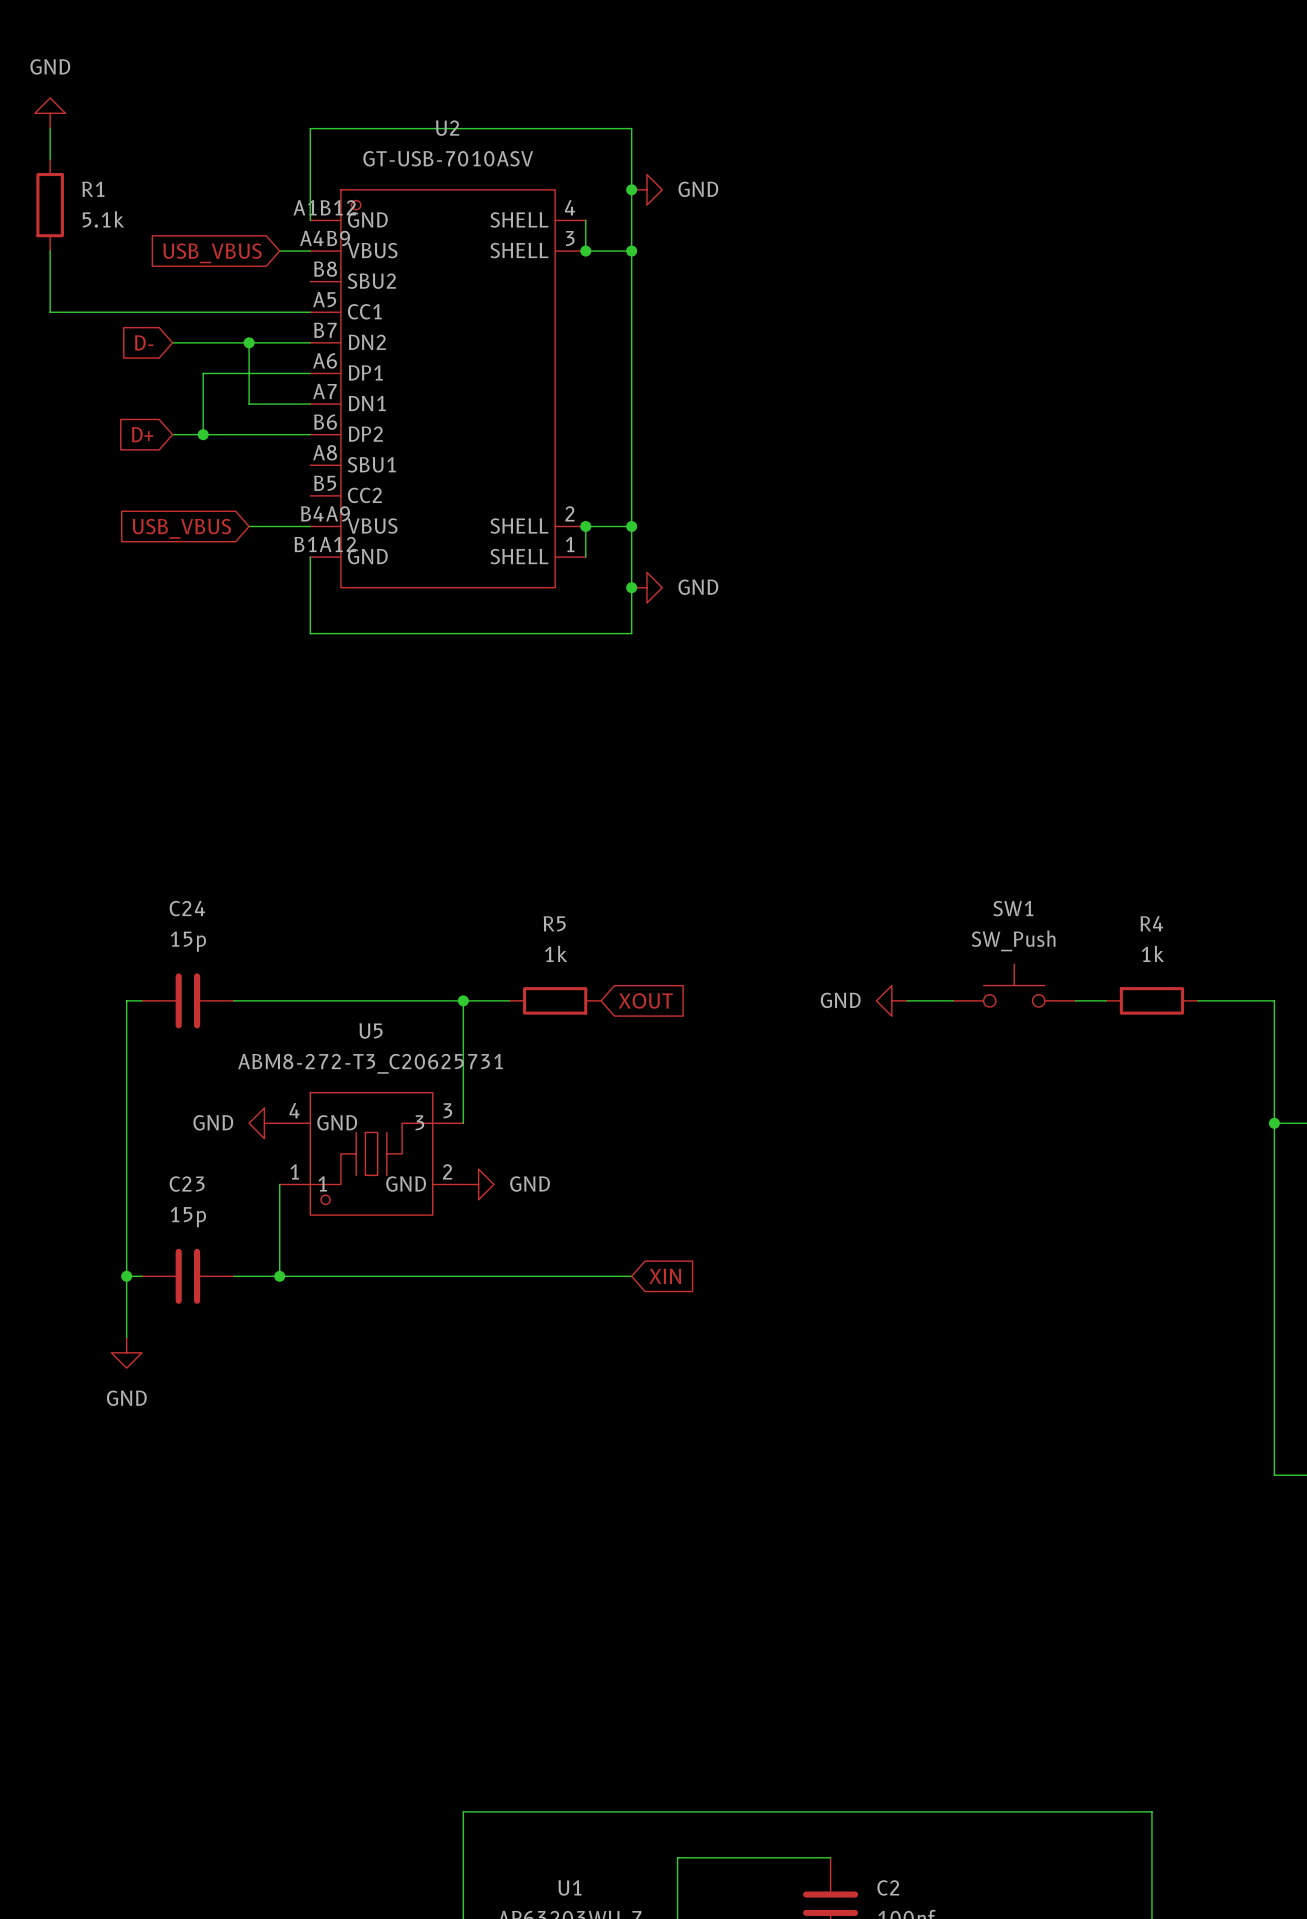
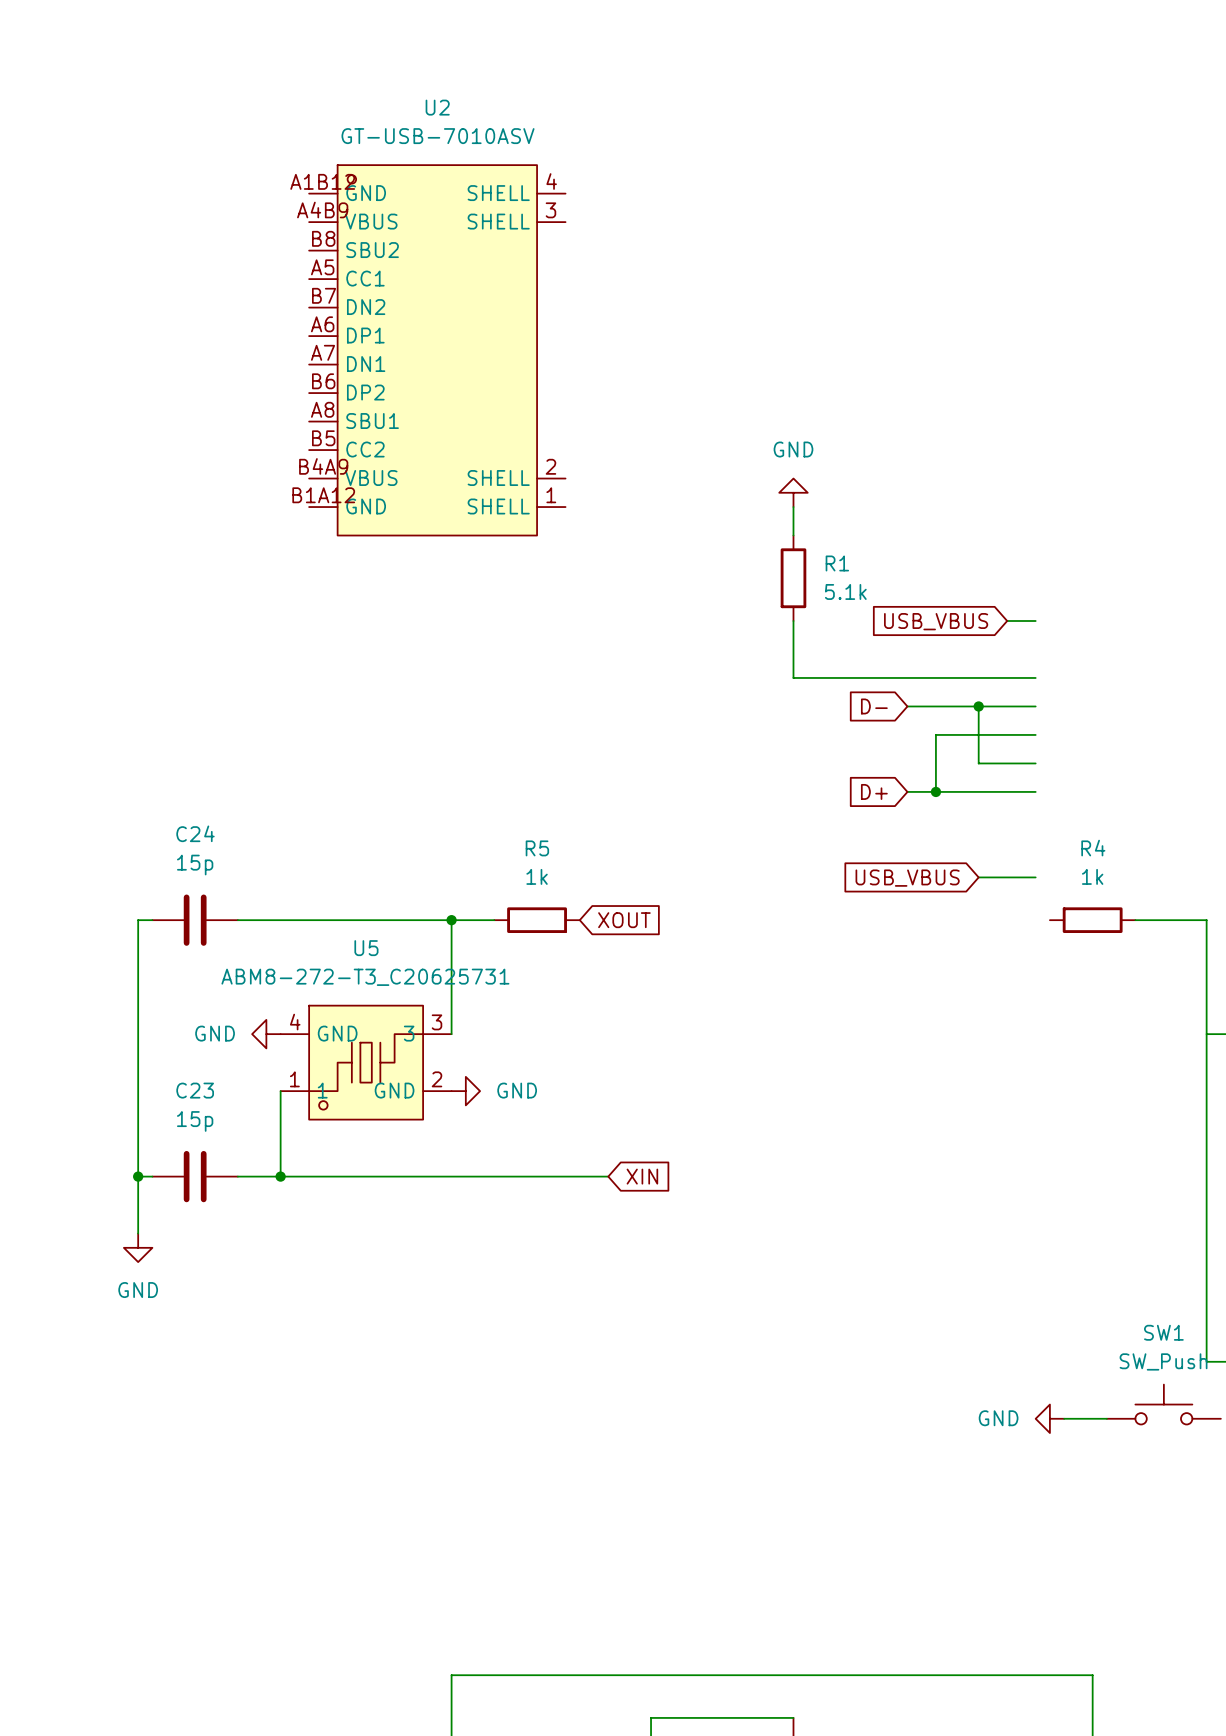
power symbol: GND (50, 113) -> none
wire: (50, 128) (50, 159) -> none
junction: (631, 189) -> none
power symbol: GND (646, 189) -> none
R1 position: (50, 205) -> (793, 578)
wire: (310, 220) (310, 128) (631, 128) (631, 633) (310, 633) (310, 557) -> none
wire: (585, 220) (585, 251) (631, 251) -> none
wire: (50, 251) (50, 312) (310, 312) -> none
wire: (279, 251) (310, 251) -> none
junction: (585, 251) -> none
junction: (631, 251) -> none
global label: USB_VBUS (212, 253) -> none
global label: D- (144, 342) -> none
wire: (172, 342) (310, 342) -> none
wire: (249, 342) (249, 404) (310, 404) -> none
junction: (249, 342) -> none
wire: (310, 373) (203, 373) (203, 434) -> none
global label: D+ (142, 434) -> none
wire: (172, 434) (310, 434) -> none
junction: (203, 434) -> none
wire: (249, 526) (310, 526) -> none
junction: (585, 526) -> none
wire: (631, 526) (585, 526) (585, 557) -> none
junction: (631, 526) -> none
global label: USB_VBUS (181, 528) -> none
wire: none -> (793, 507) (793, 535)
junction: (631, 587) -> none
power symbol rotation: 0° (646, 587) -> 90° counterclockwise (793, 492)
power symbol position: GND (646, 587) -> GND (793, 492)
wire: none -> (793, 621) (793, 677) (1035, 677)
wire: none -> (1007, 621) (1035, 621)
global label: none -> USB_VBUS (936, 621)
global label: none -> D- (874, 706)
wire: none -> (907, 706) (1035, 706)
wire: none -> (978, 706) (978, 763) (1035, 763)
junction: none -> (978, 706)
wire: none -> (1035, 734) (935, 734) (935, 791)
global label: none -> D+ (874, 791)
wire: none -> (907, 791) (1035, 791)
junction: none -> (935, 791)
wire: none -> (978, 877) (1035, 877)
global label: none -> USB_VBUS (907, 878)
SW1 position: (1014, 985) -> (1163, 1404)
power symbol: GND (891, 1000) -> none
wire: (907, 1000) (953, 1000) -> none
wire: (1075, 1000) (1106, 1000) -> none
junction: (1274, 1123) -> none
power symbol: none -> GND (1049, 1418)
wire: none -> (1064, 1418) (1106, 1418)

